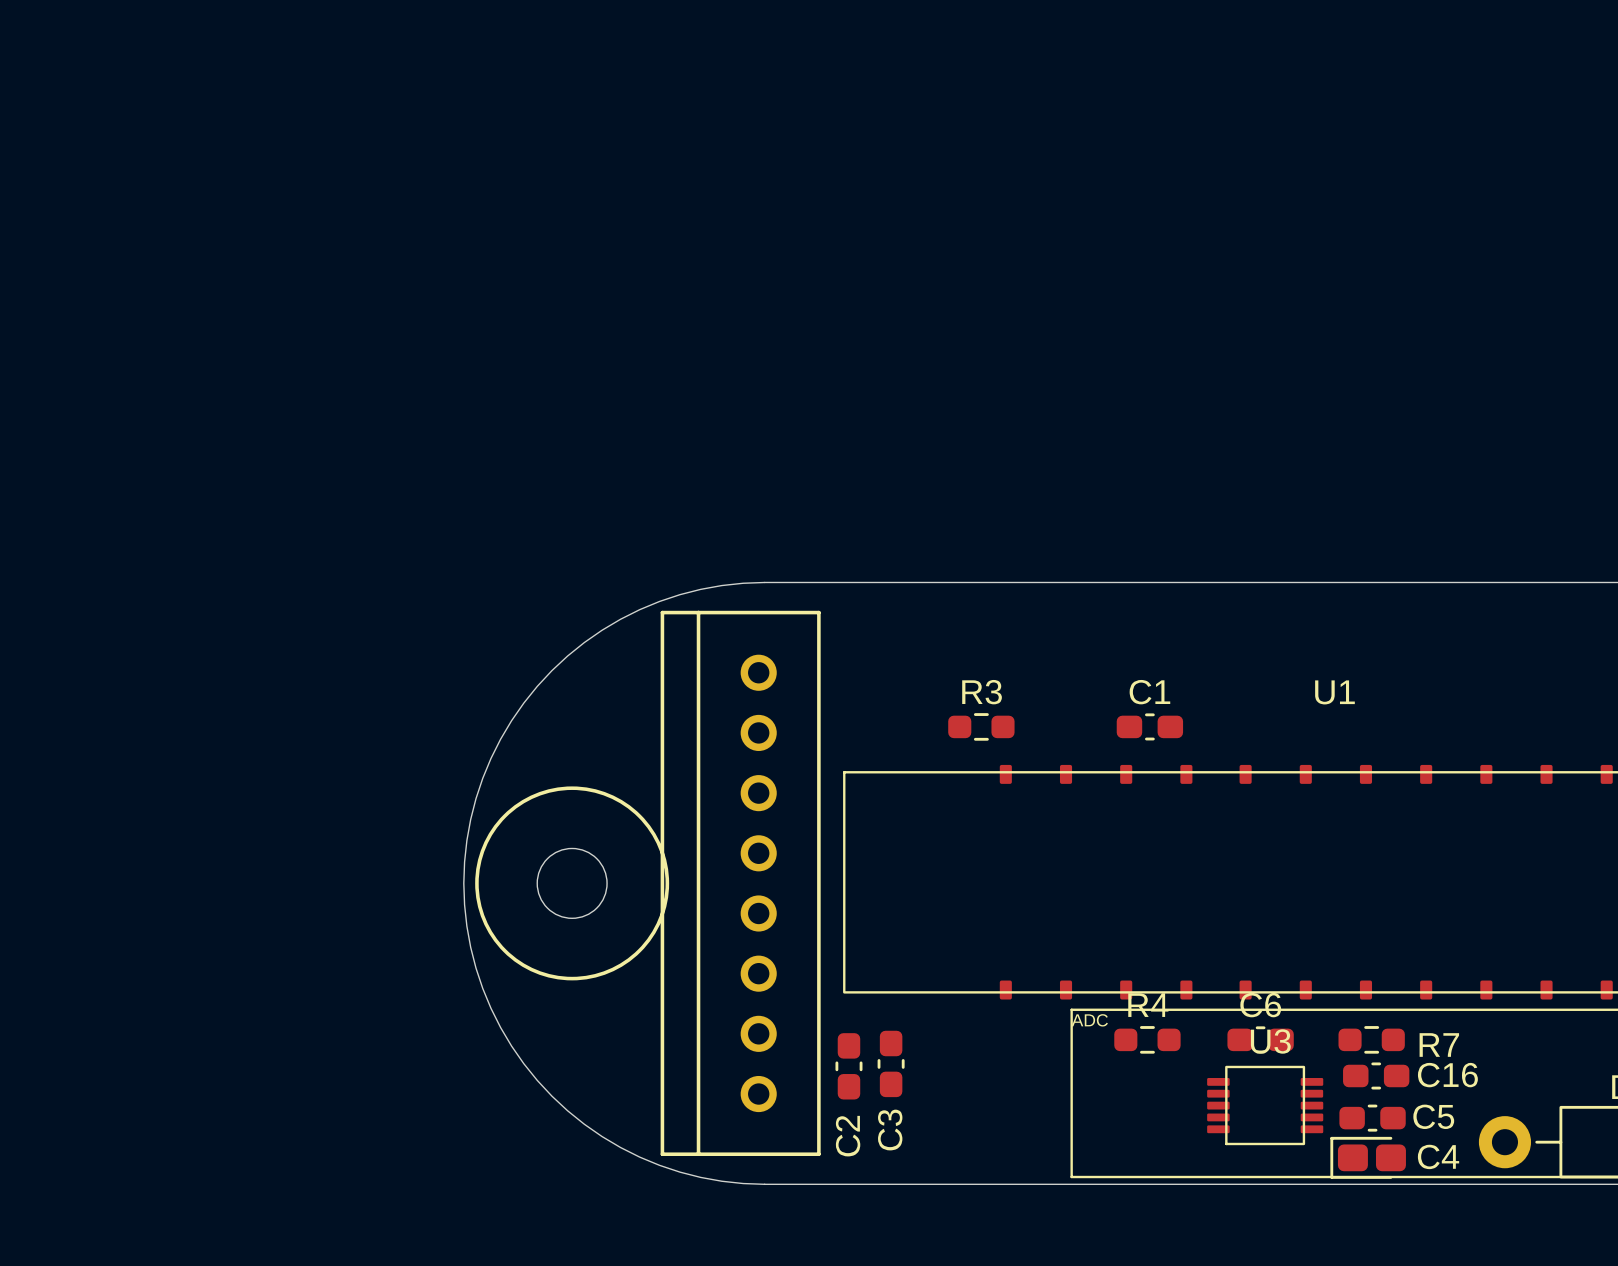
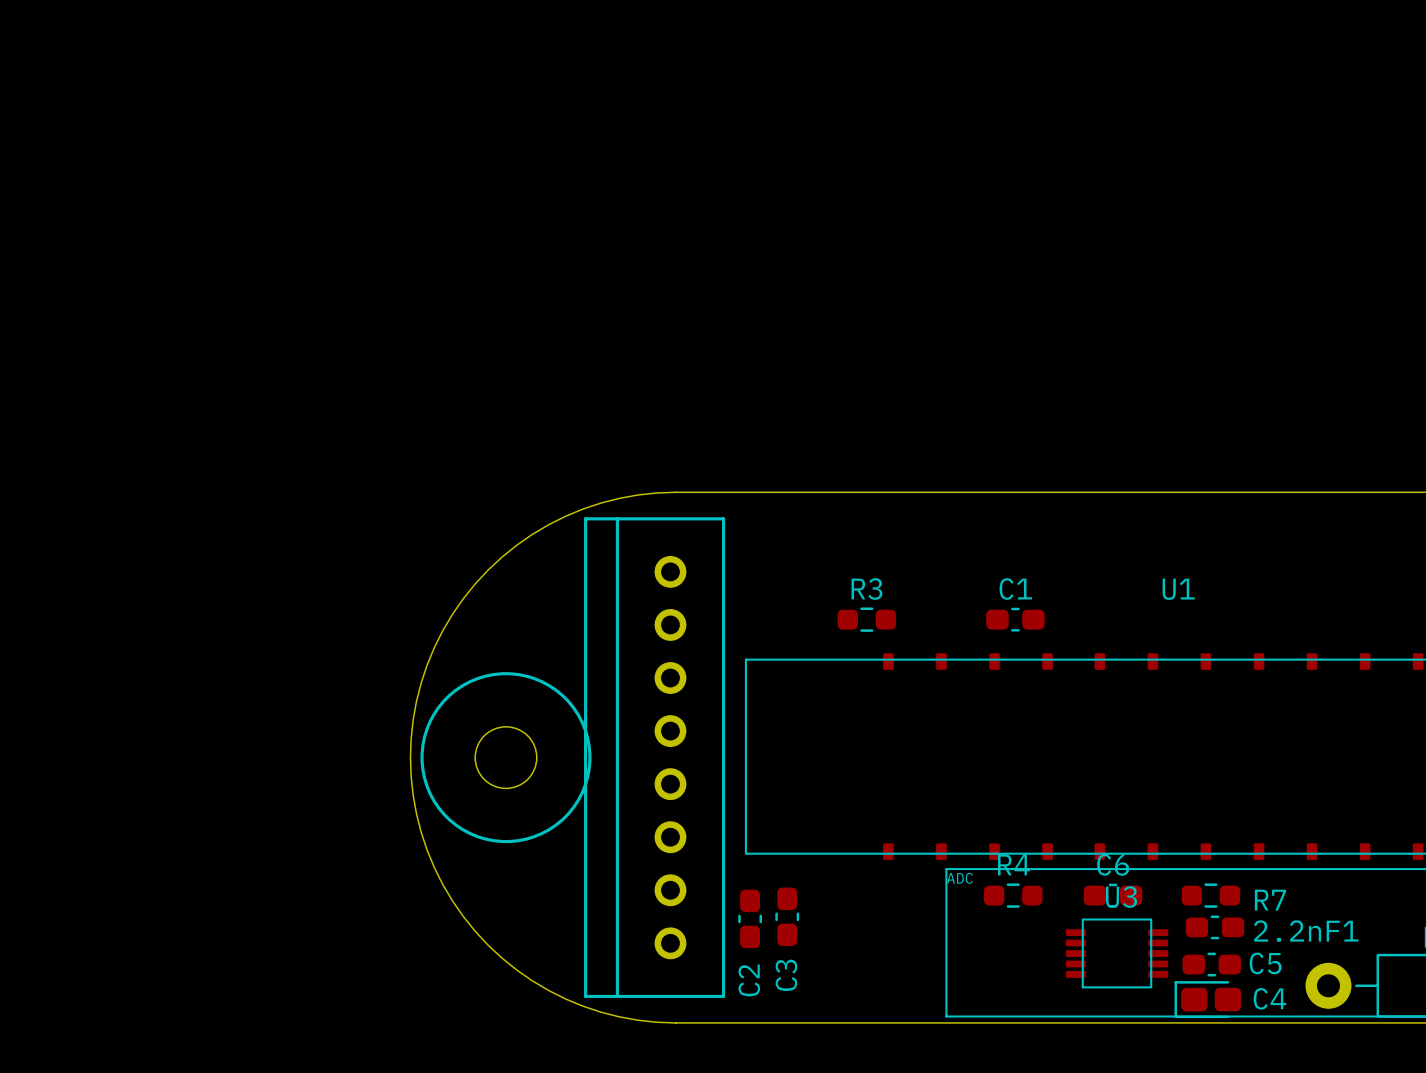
C16 name: C16 (1447, 1075) -> 2.2nF1 (1306, 931)

